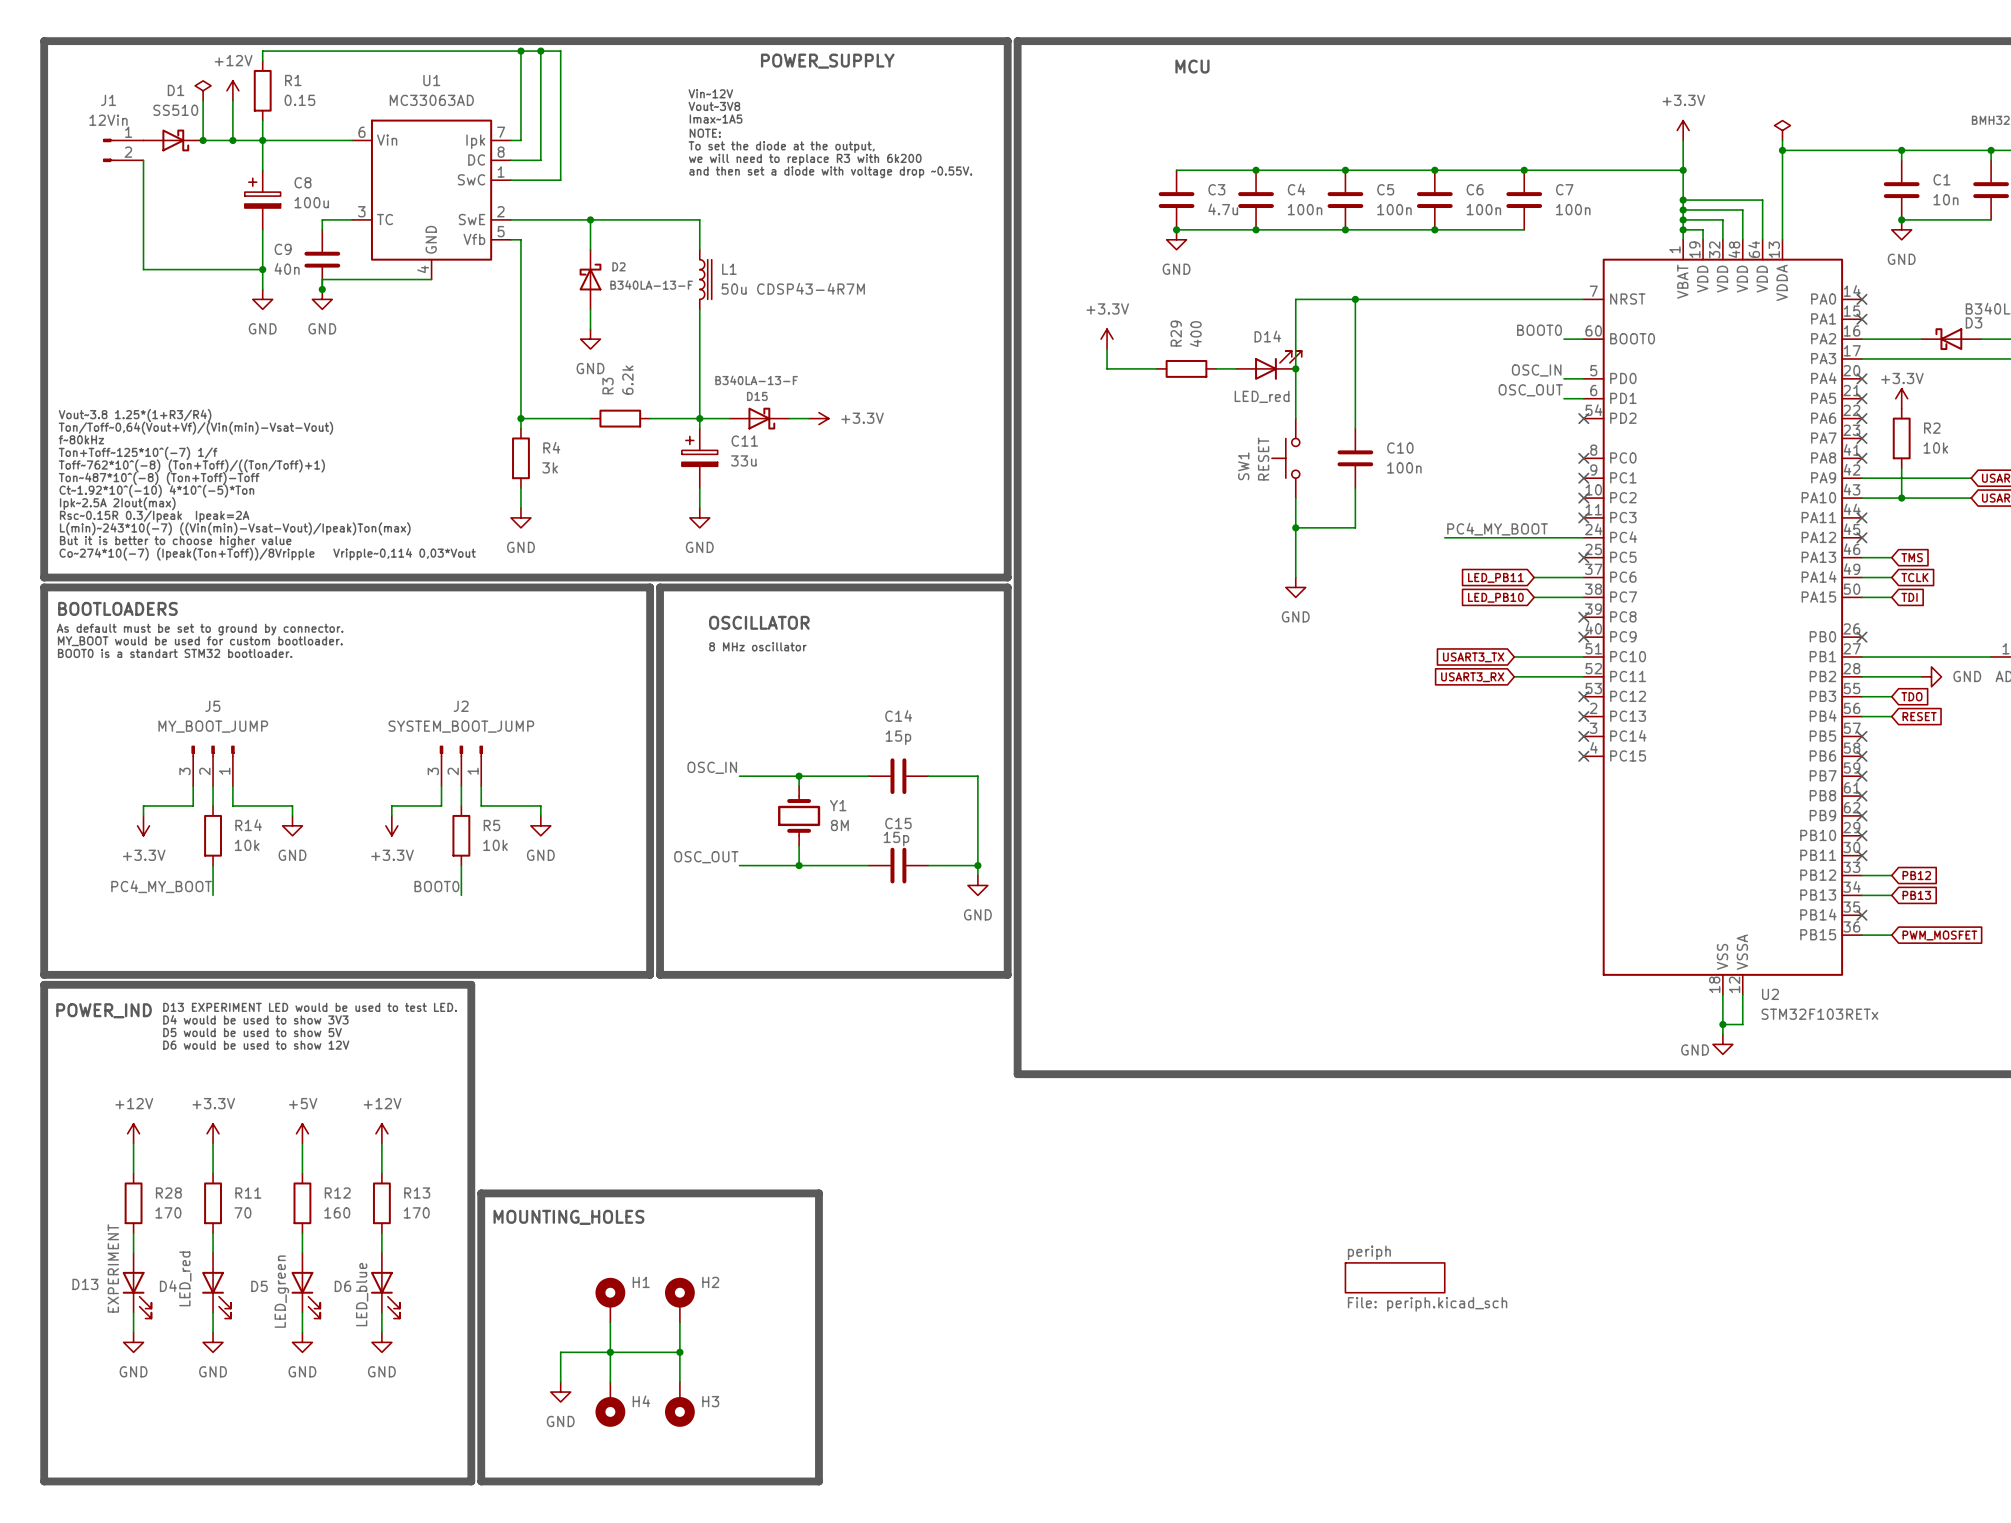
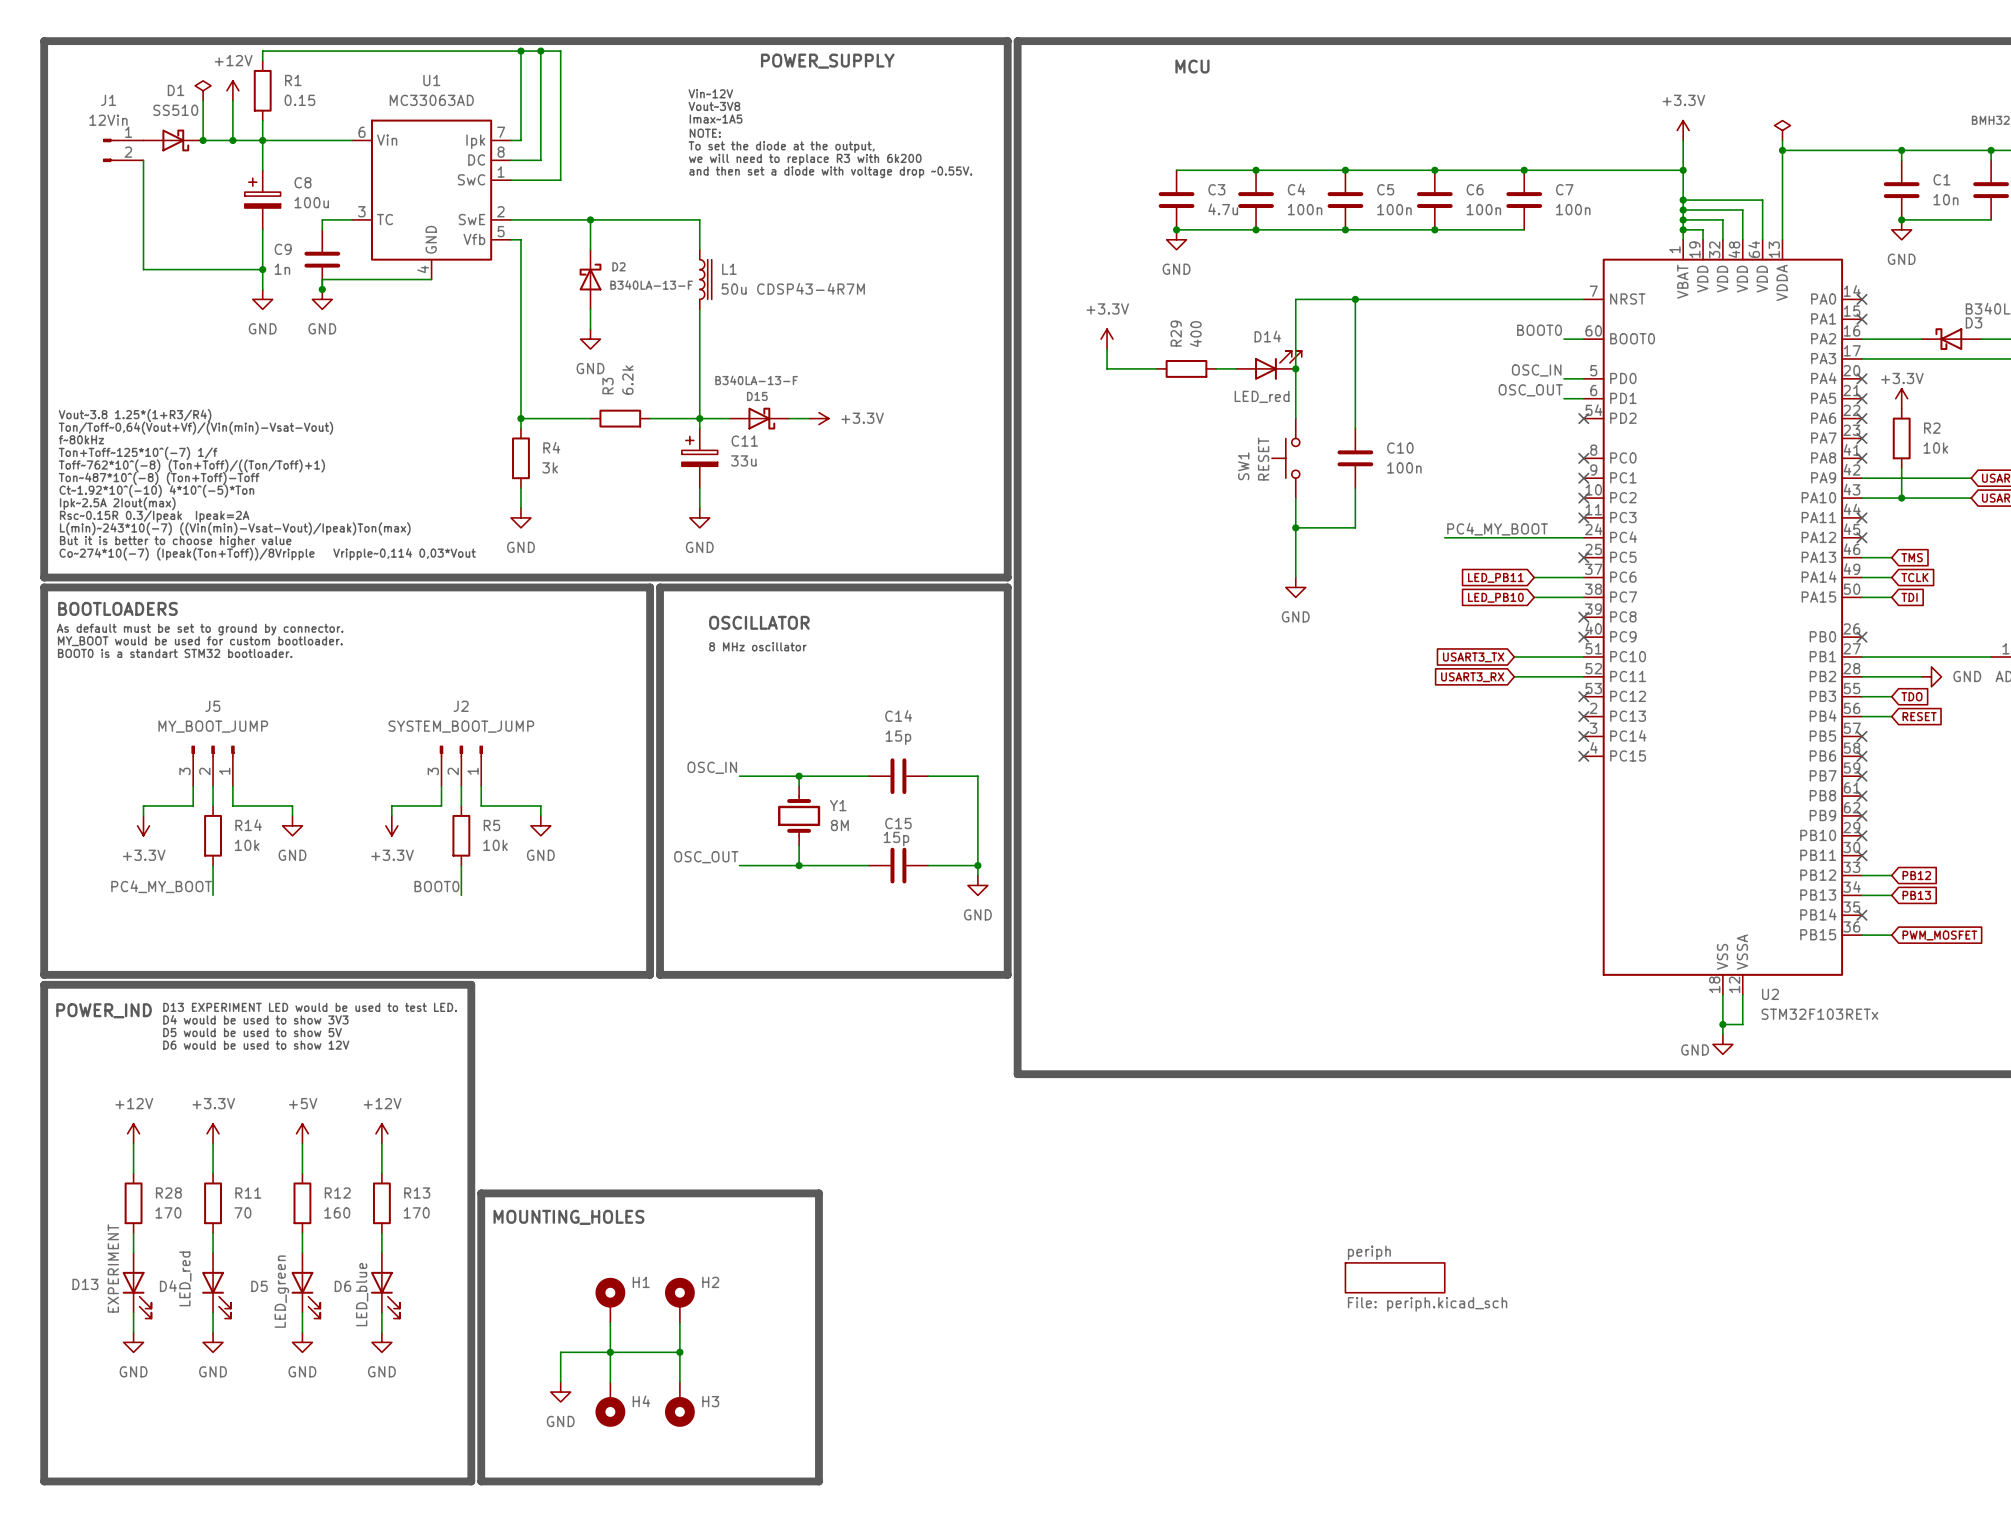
C9 value: 40n (287, 268) -> 1n (282, 269)

